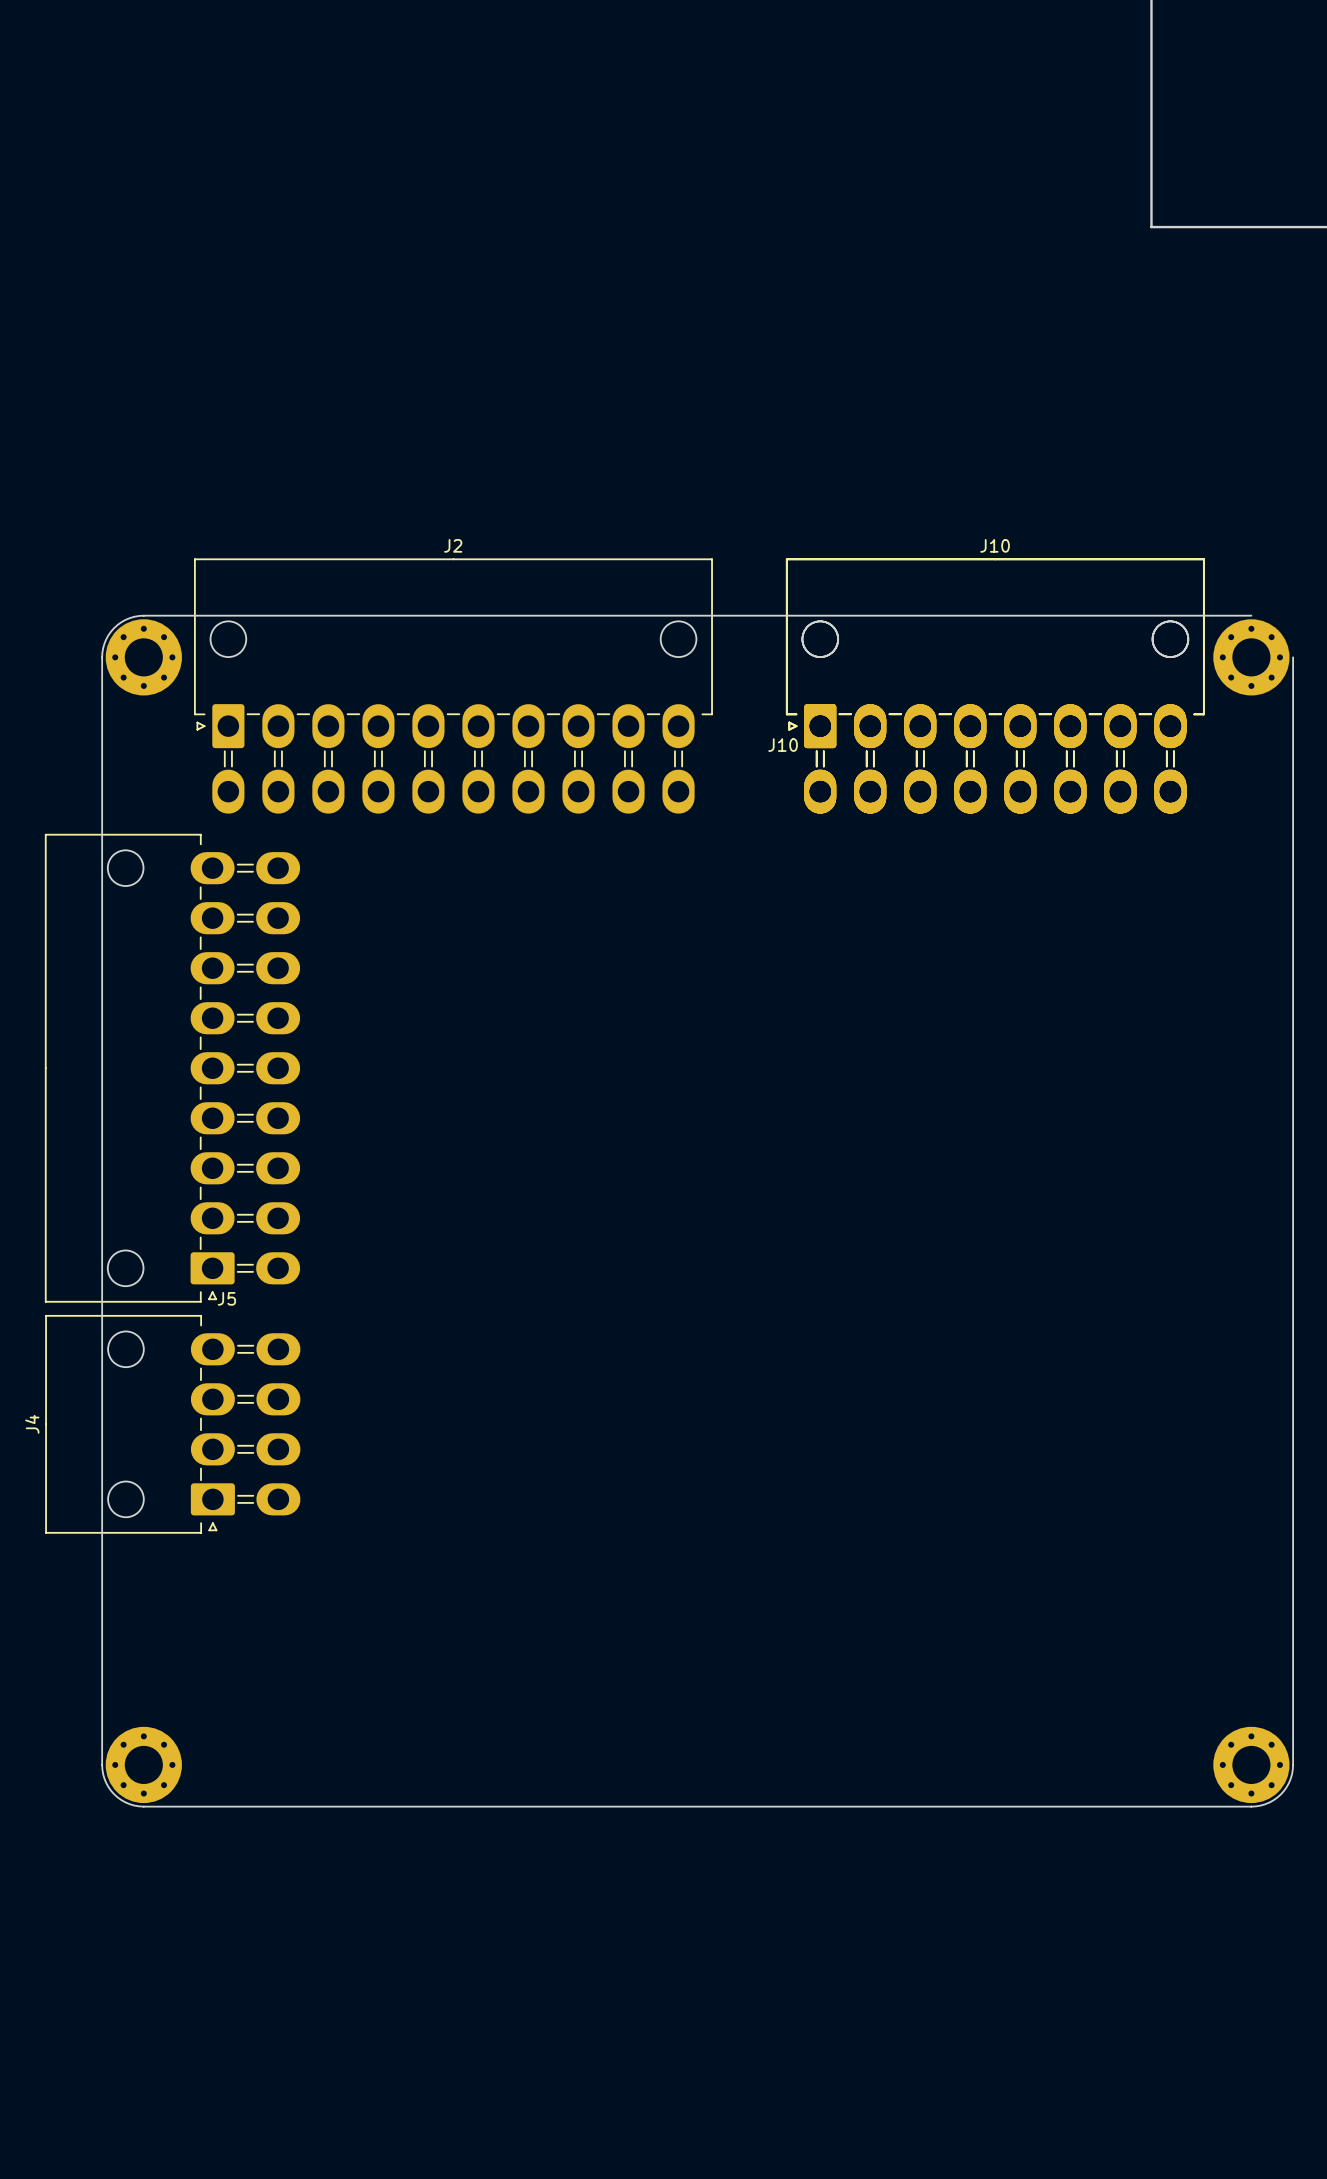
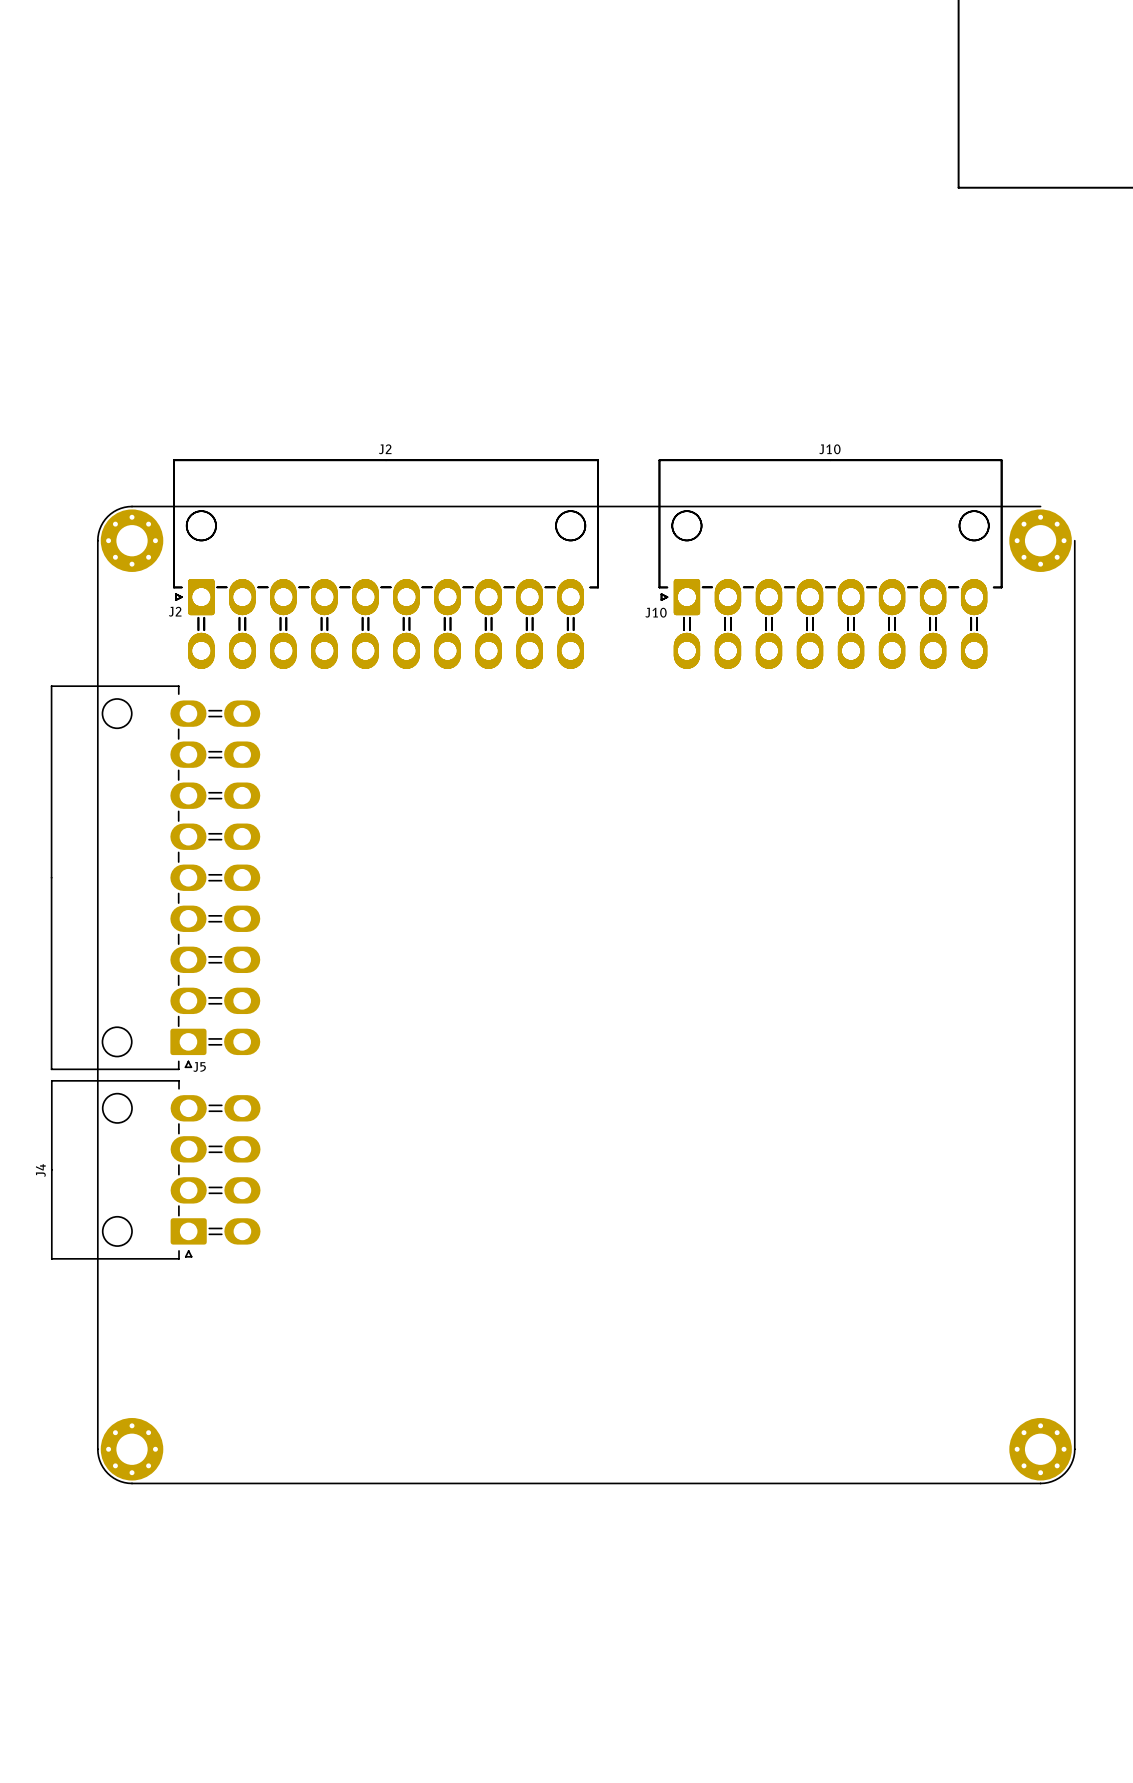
J2: none -> (386, 564)

